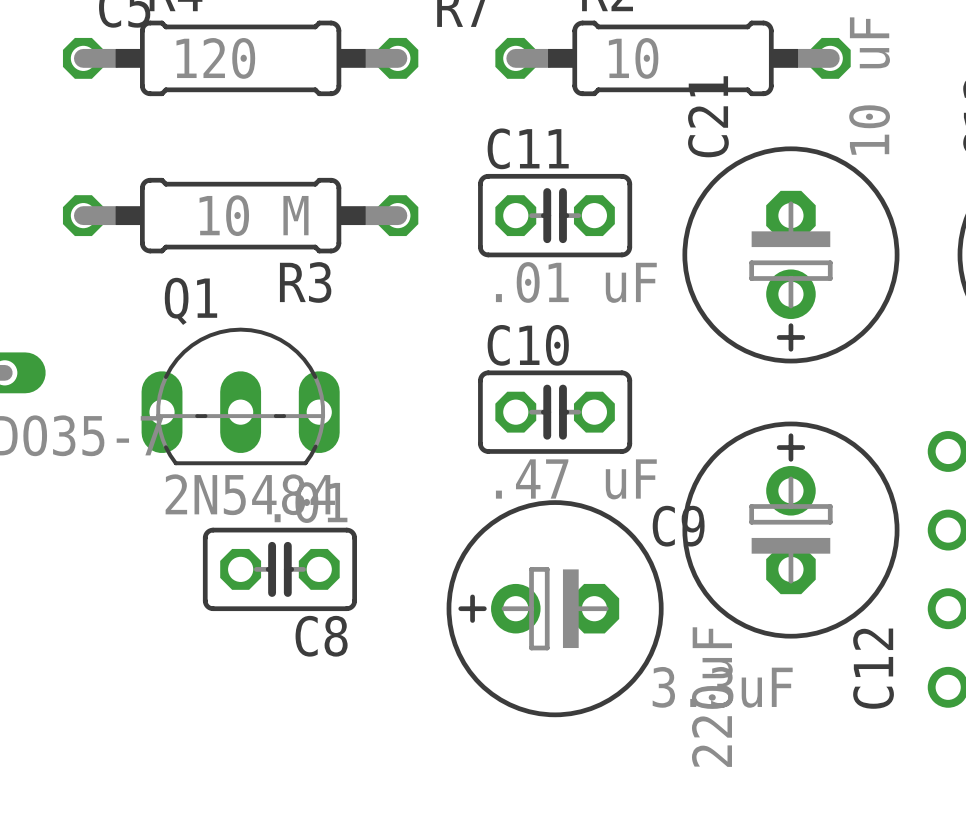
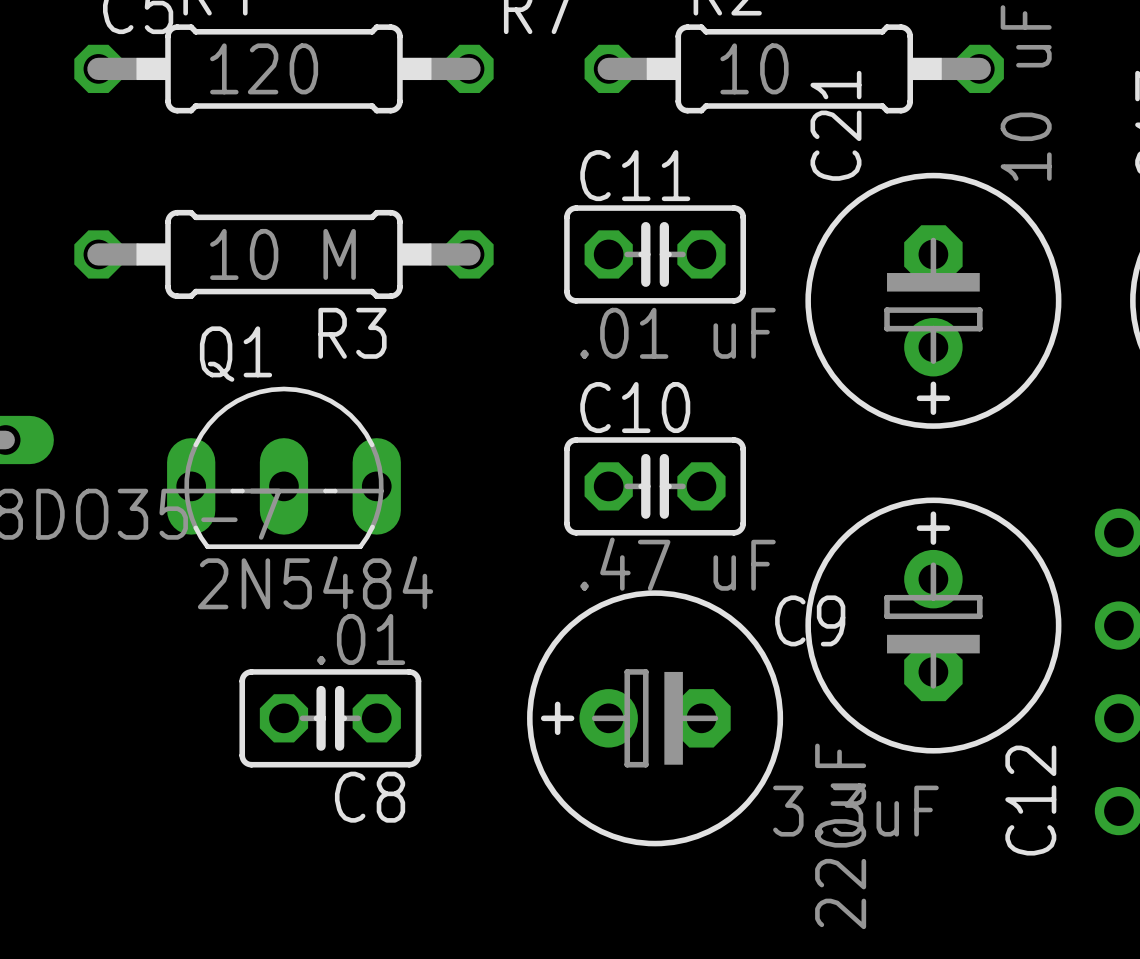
C8 position: (279, 569) -> (330, 718)

